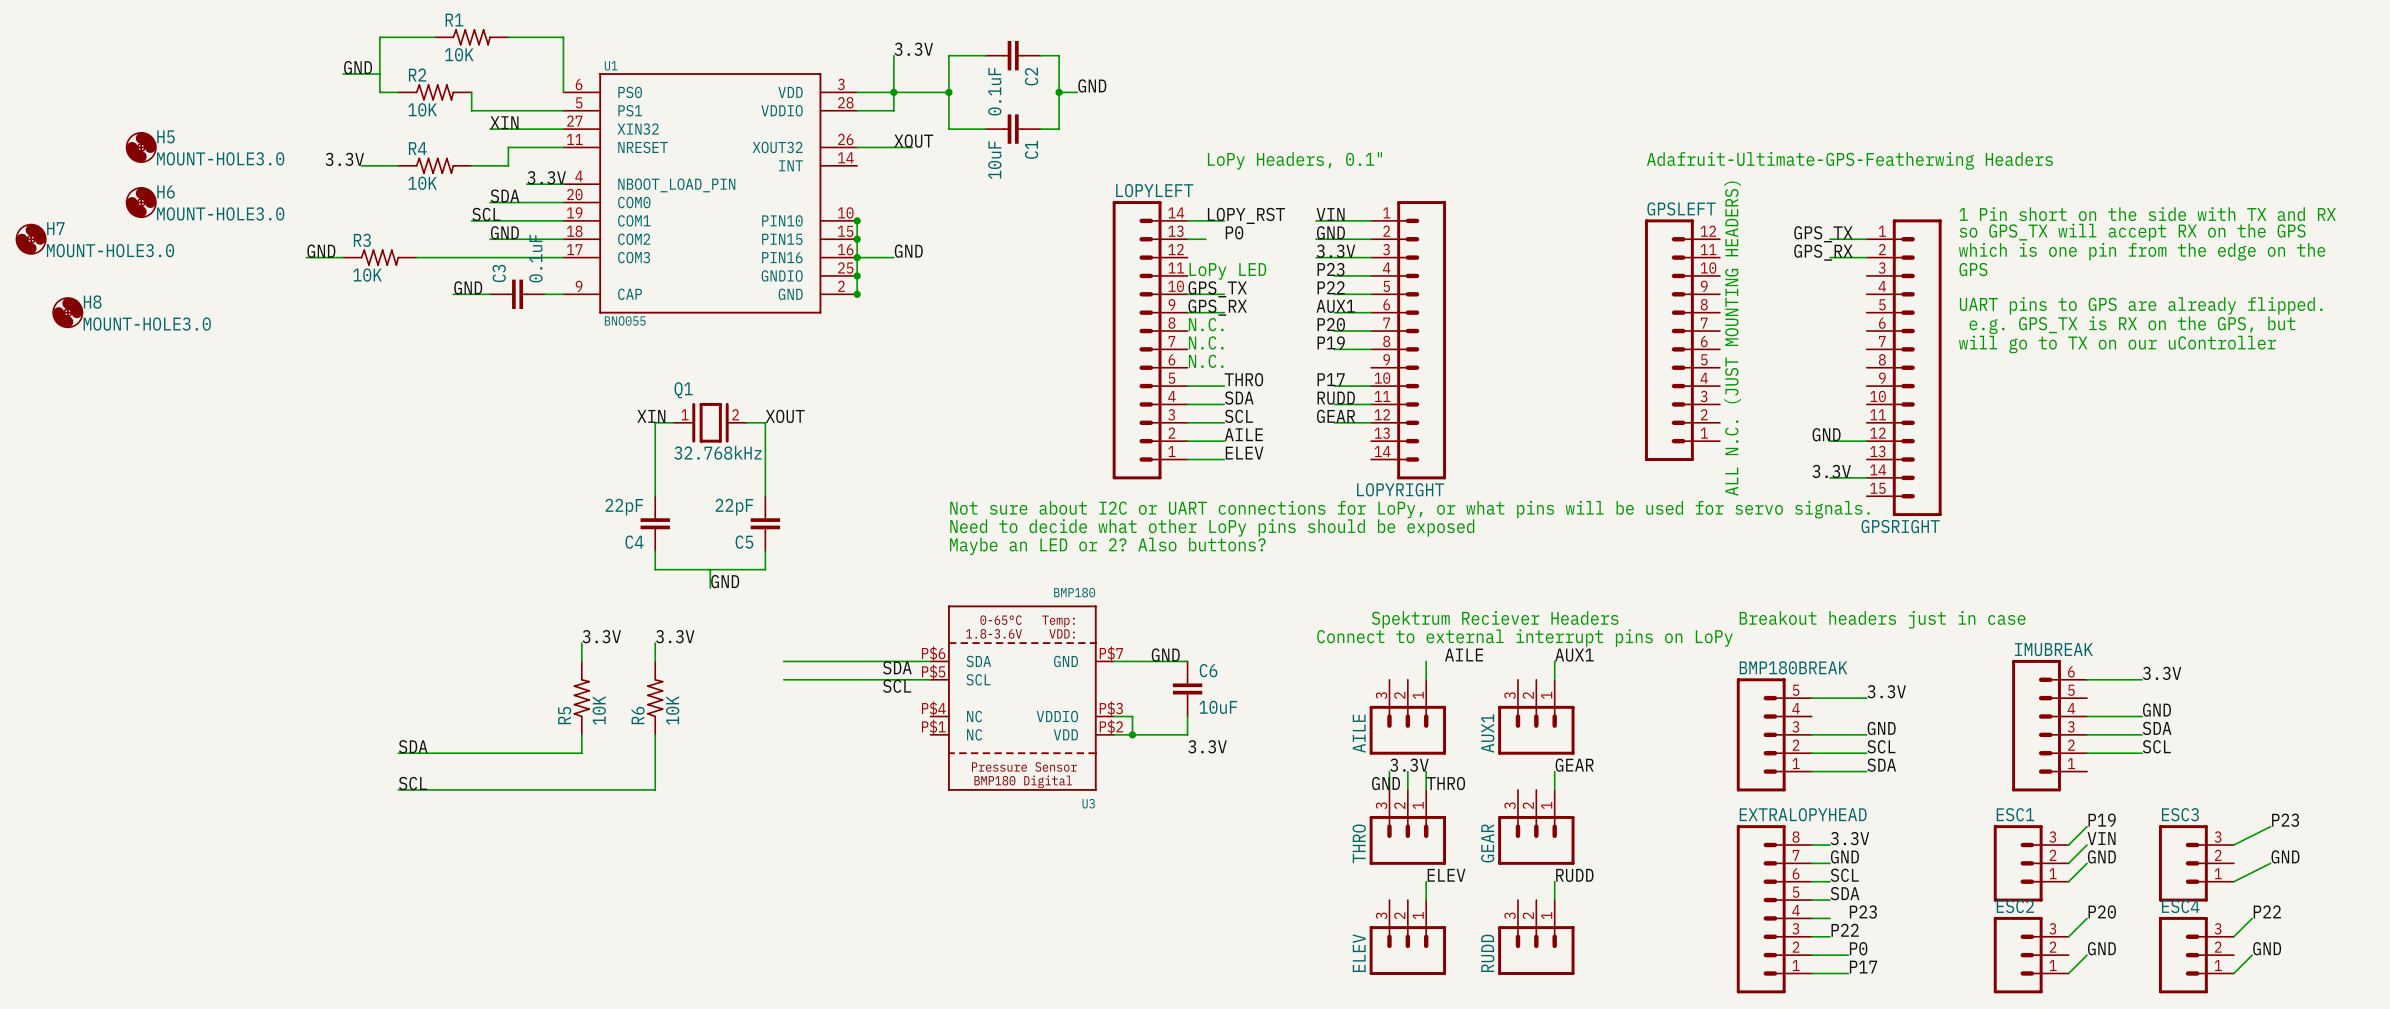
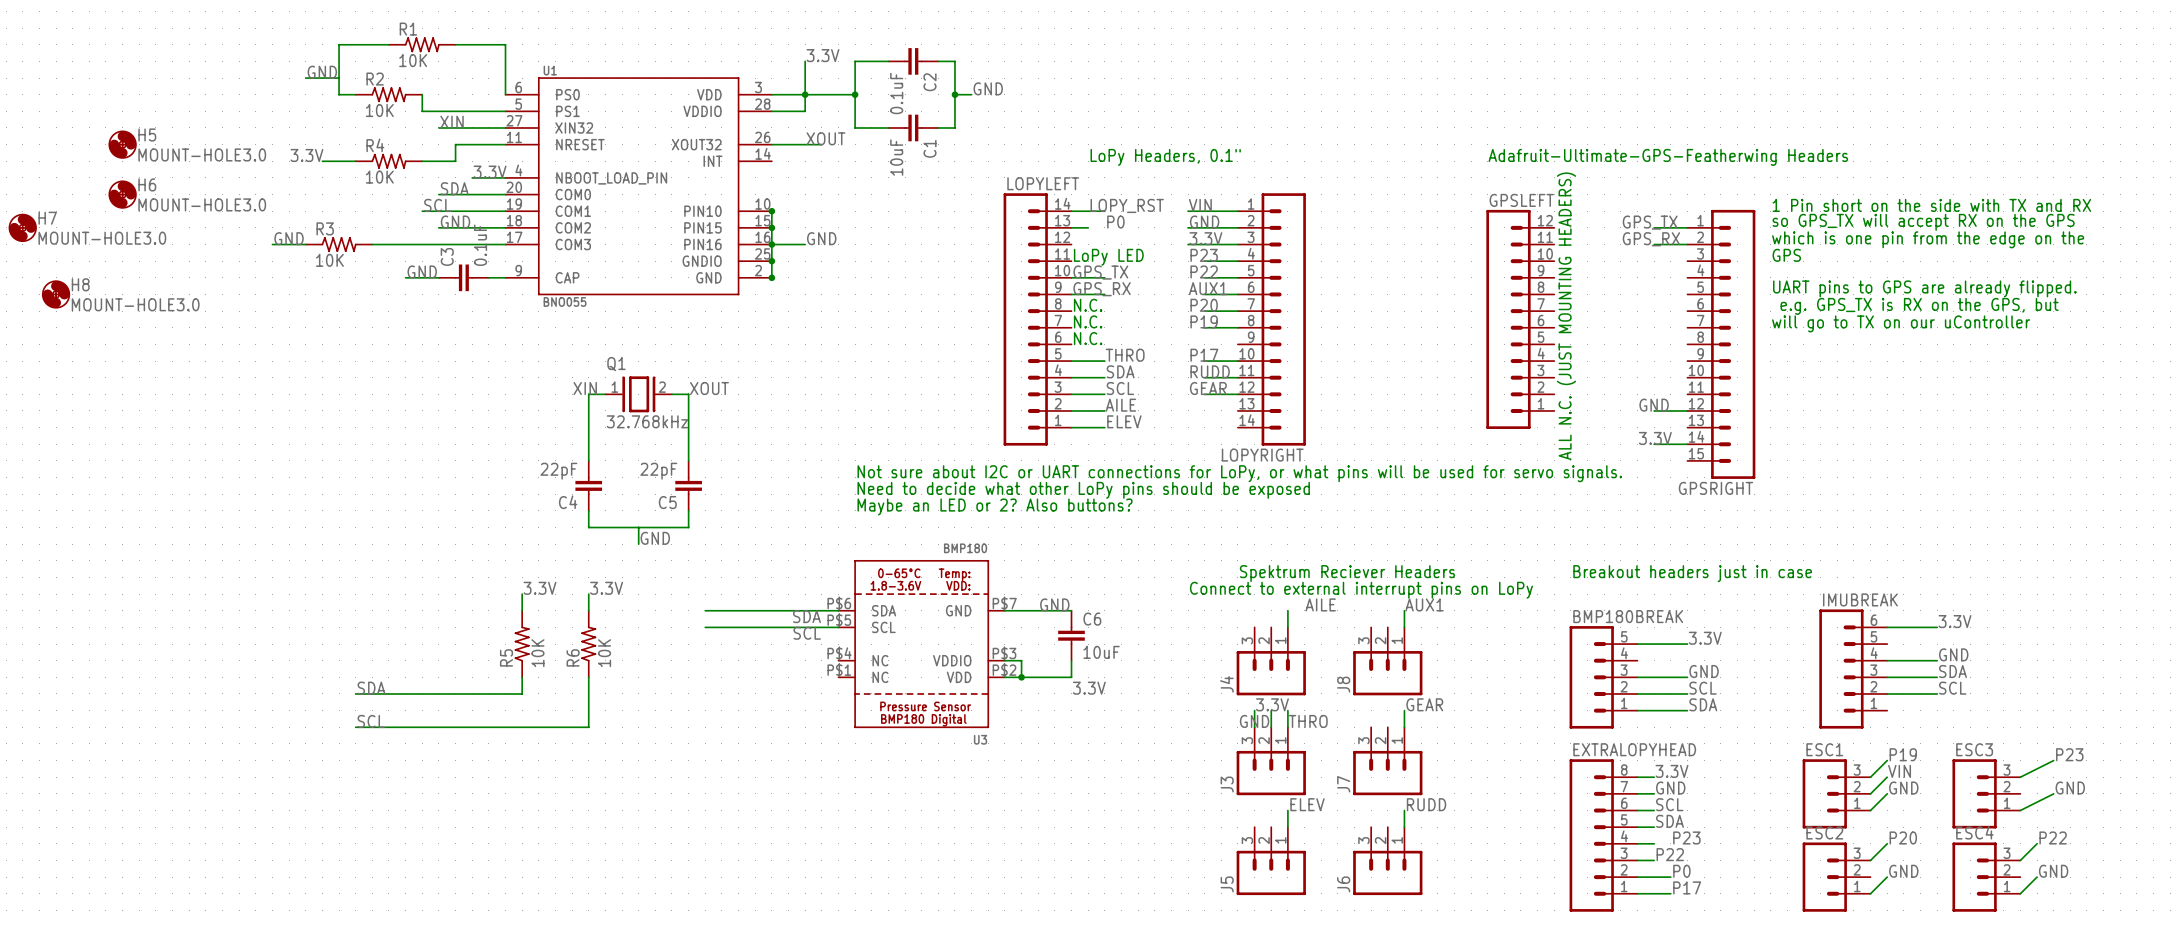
AILE name: AILE (1359, 733) -> J4 (1226, 684)
AUX1 name: AUX1 (1487, 733) -> J8 (1343, 684)
THRO name: THRO (1359, 843) -> J3 (1227, 784)
GEAR name: GEAR (1487, 843) -> J7 (1343, 784)
ELEV name: ELEV (1359, 953) -> J5 (1227, 884)
RUDD name: RUDD (1487, 953) -> J6 (1343, 884)

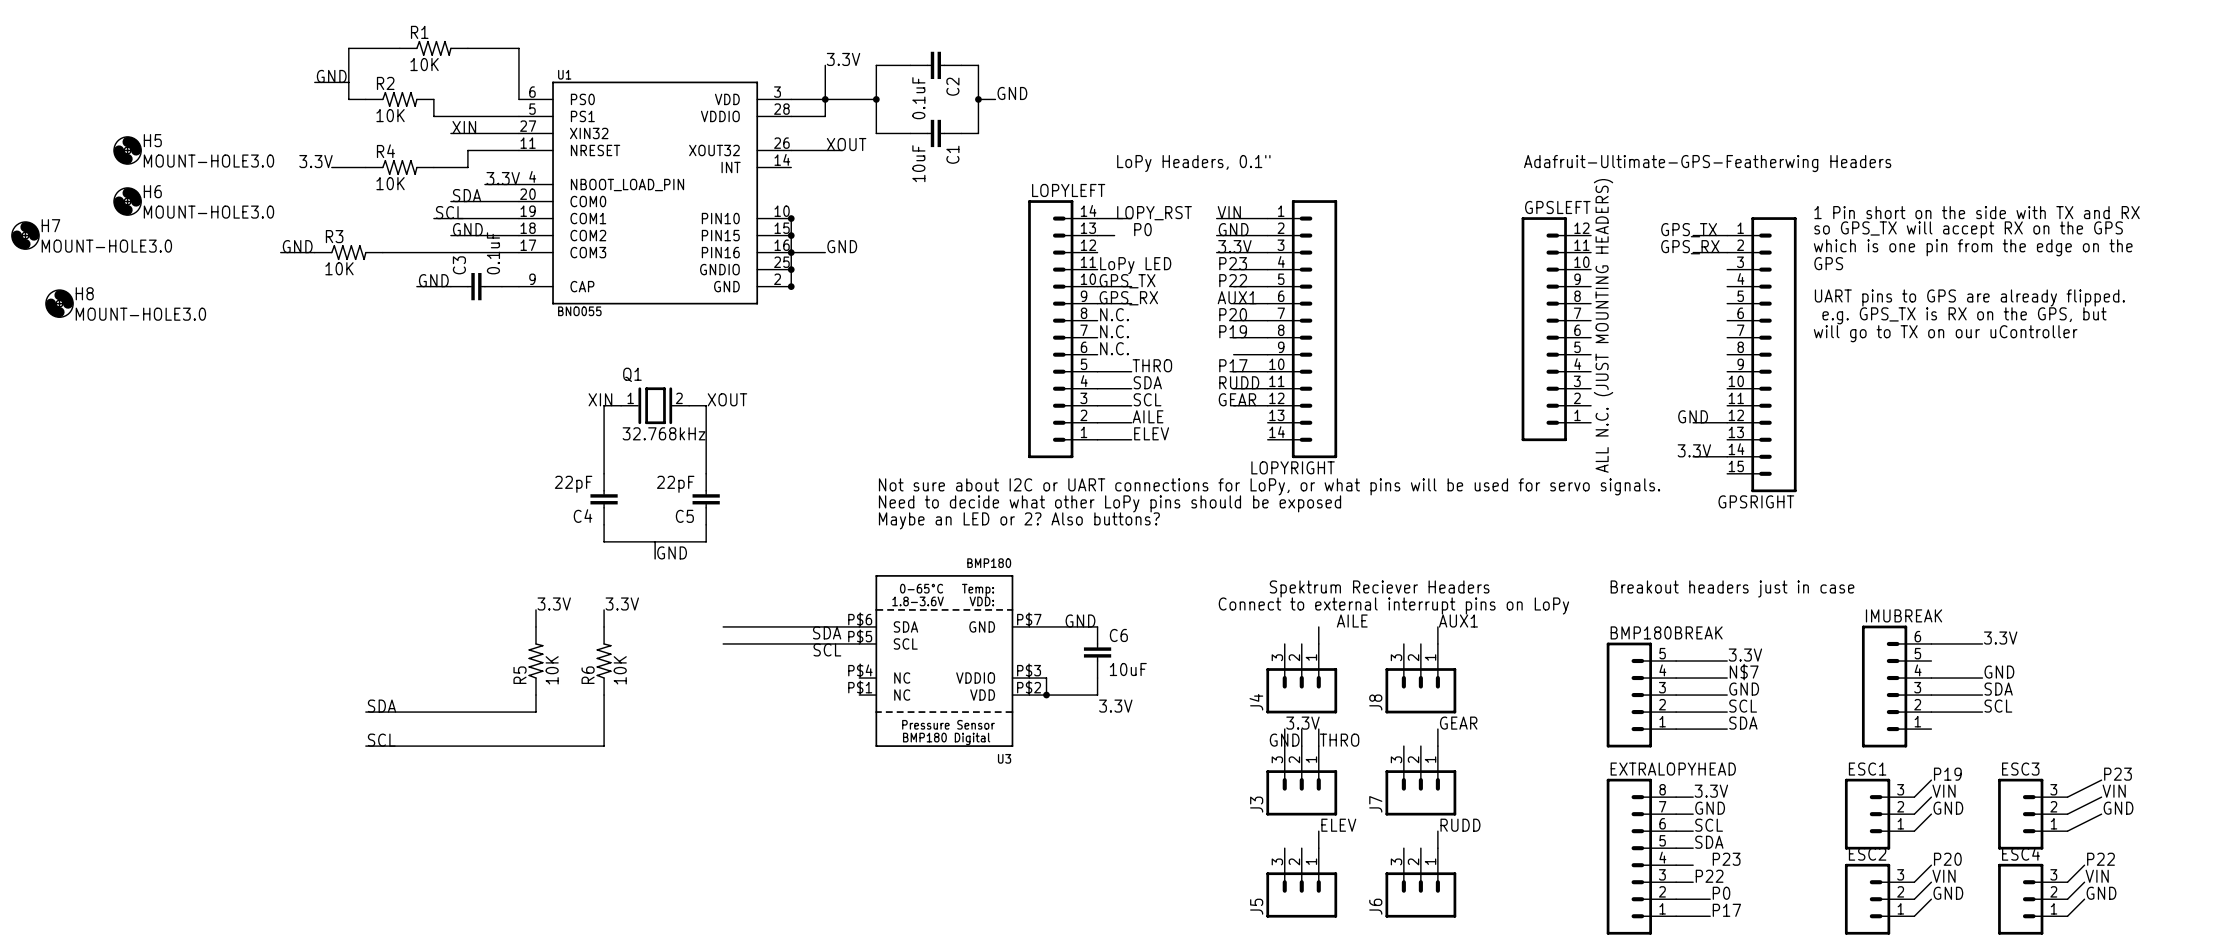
wire: none -> (1233, 354) (1267, 354)
label: none -> N$7 (1744, 672)
wire: none -> (1676, 678) (1727, 678)
label: none -> VIN (2114, 791)
wire: none -> (2101, 797) (2067, 814)
label: none -> VIN (1944, 876)
label: none -> VIN (2097, 876)
wire: none -> (1931, 882) (1914, 899)
wire: none -> (2084, 882) (2067, 899)

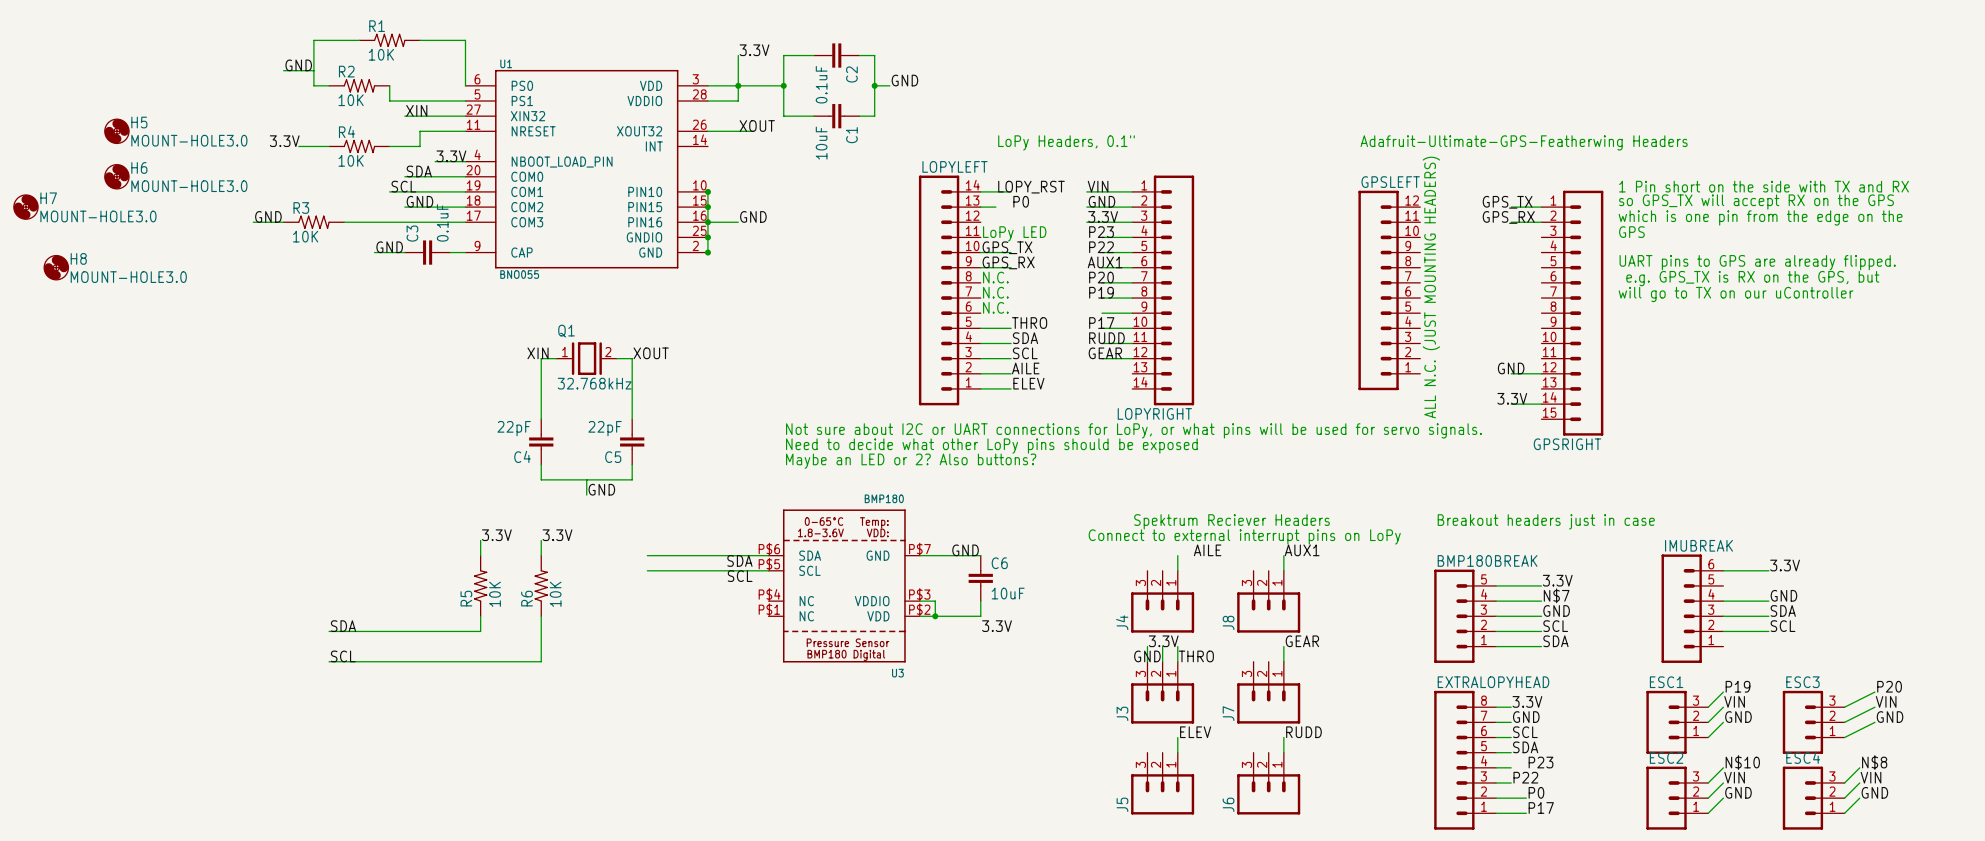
label: P23 (2118, 774) -> P20 (1889, 686)
label: P20 (1947, 859) -> N$10 (1742, 762)
label: P22 (2101, 859) -> N$8 (1874, 762)

